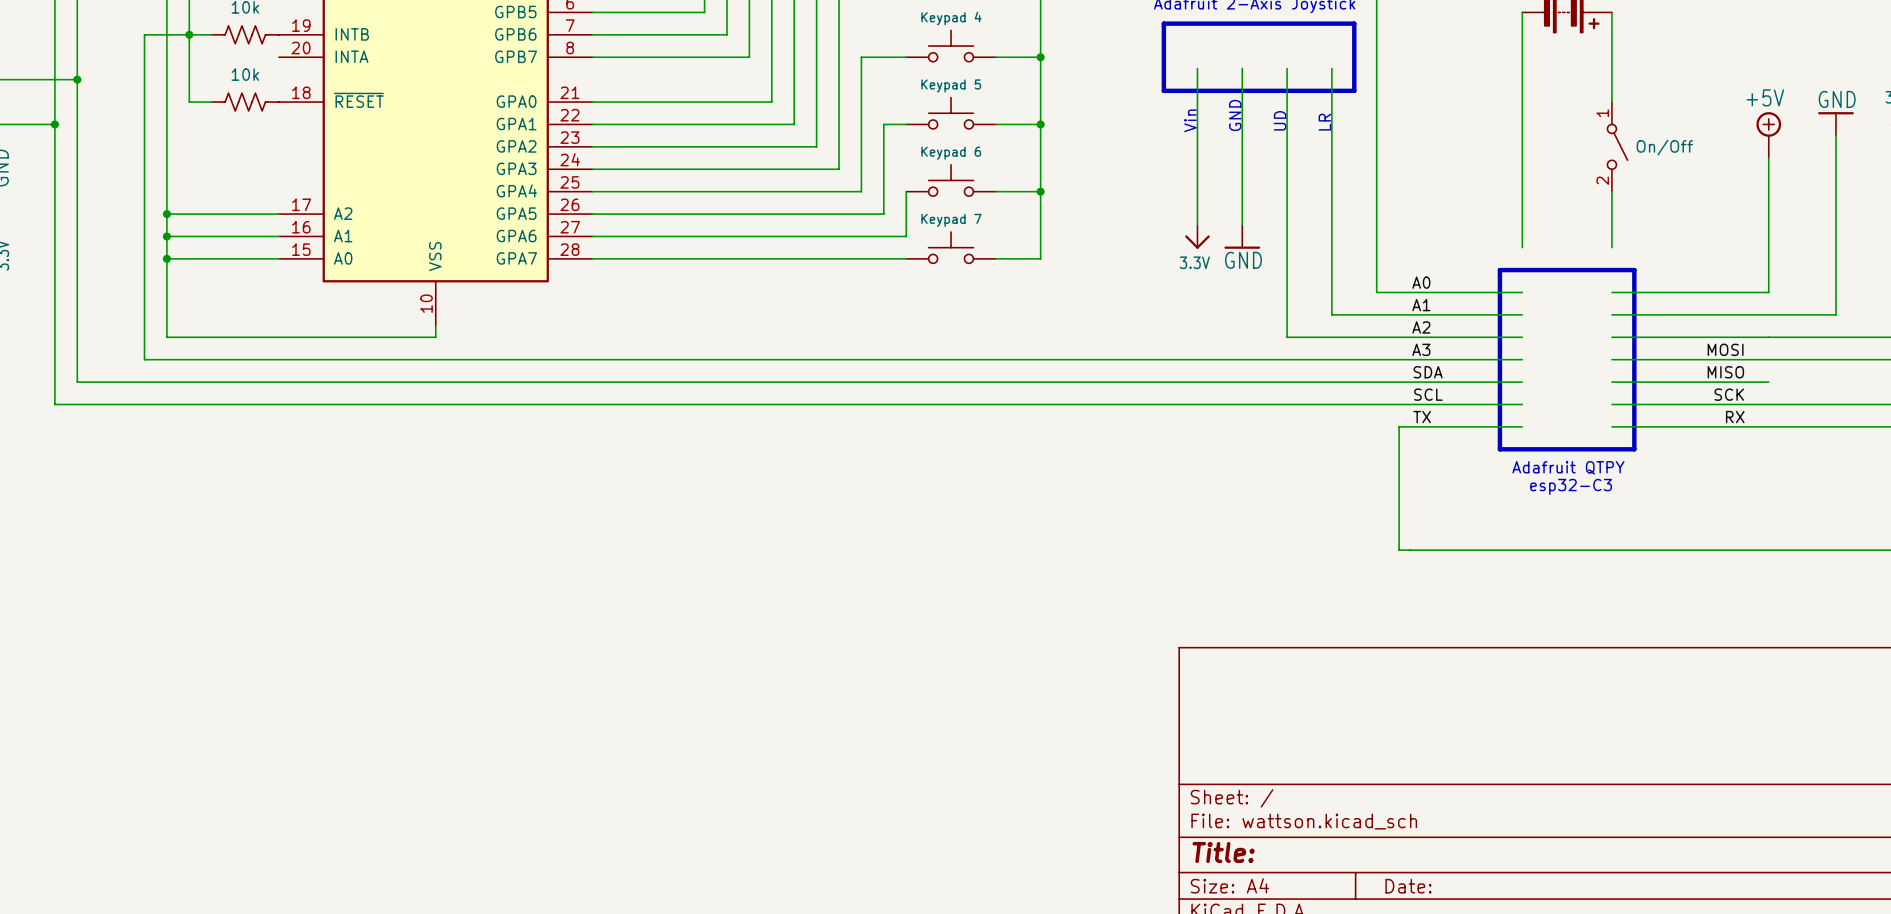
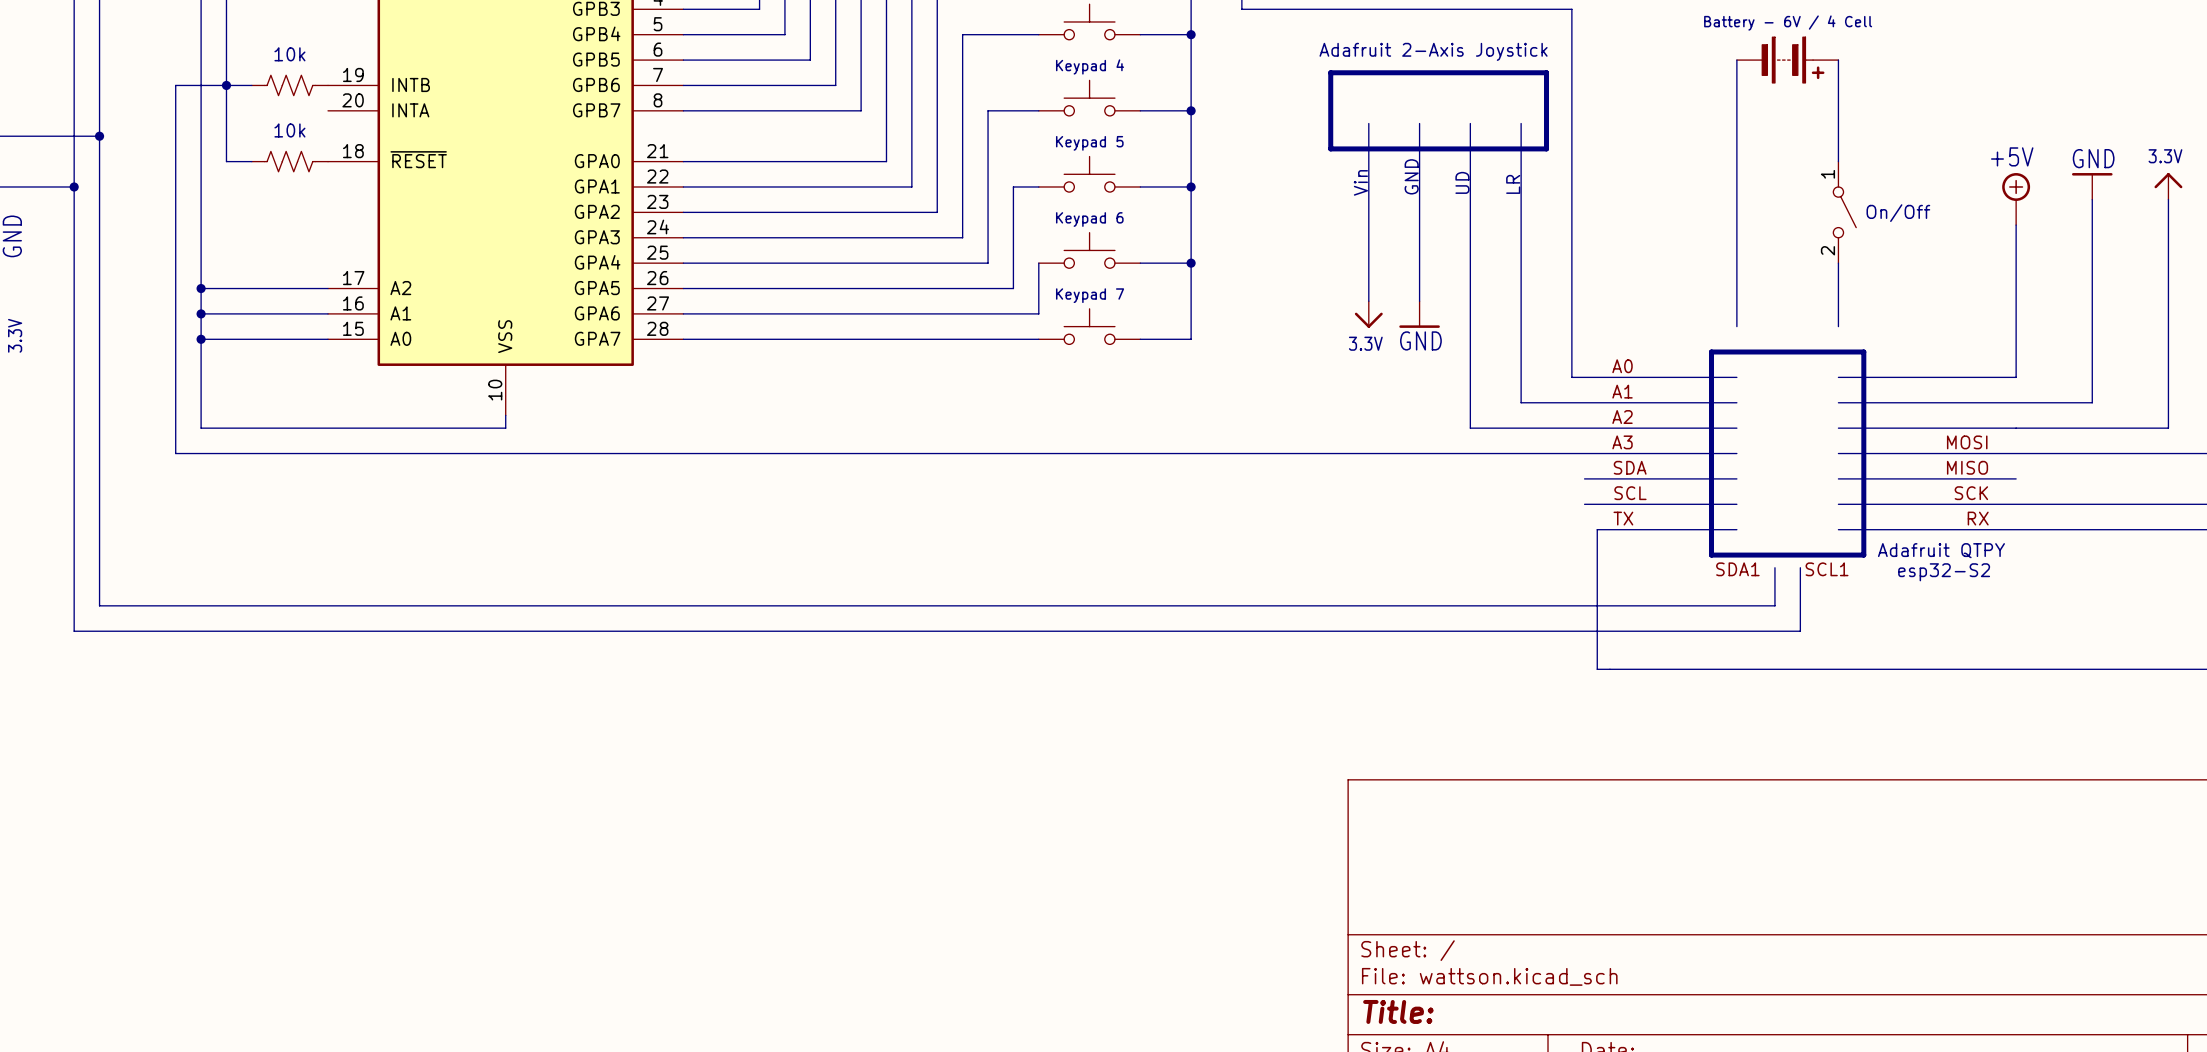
wire: (77, 382) (1387, 382) -> (99, 478) (99, 605) (1774, 605) (1774, 567)
wire: (54, 404) (1387, 404) -> (74, 504) (74, 631) (1800, 631) (1800, 567)
label: none -> SDA1 (1737, 569)
label: none -> SCL1 (1827, 569)
text: none -> esp32-S2 (1944, 572)
text position: Adafruit QTPY (1568, 467) -> Adafruit QTPY (1941, 550)
text: esp32-C3 (1571, 486) -> none

